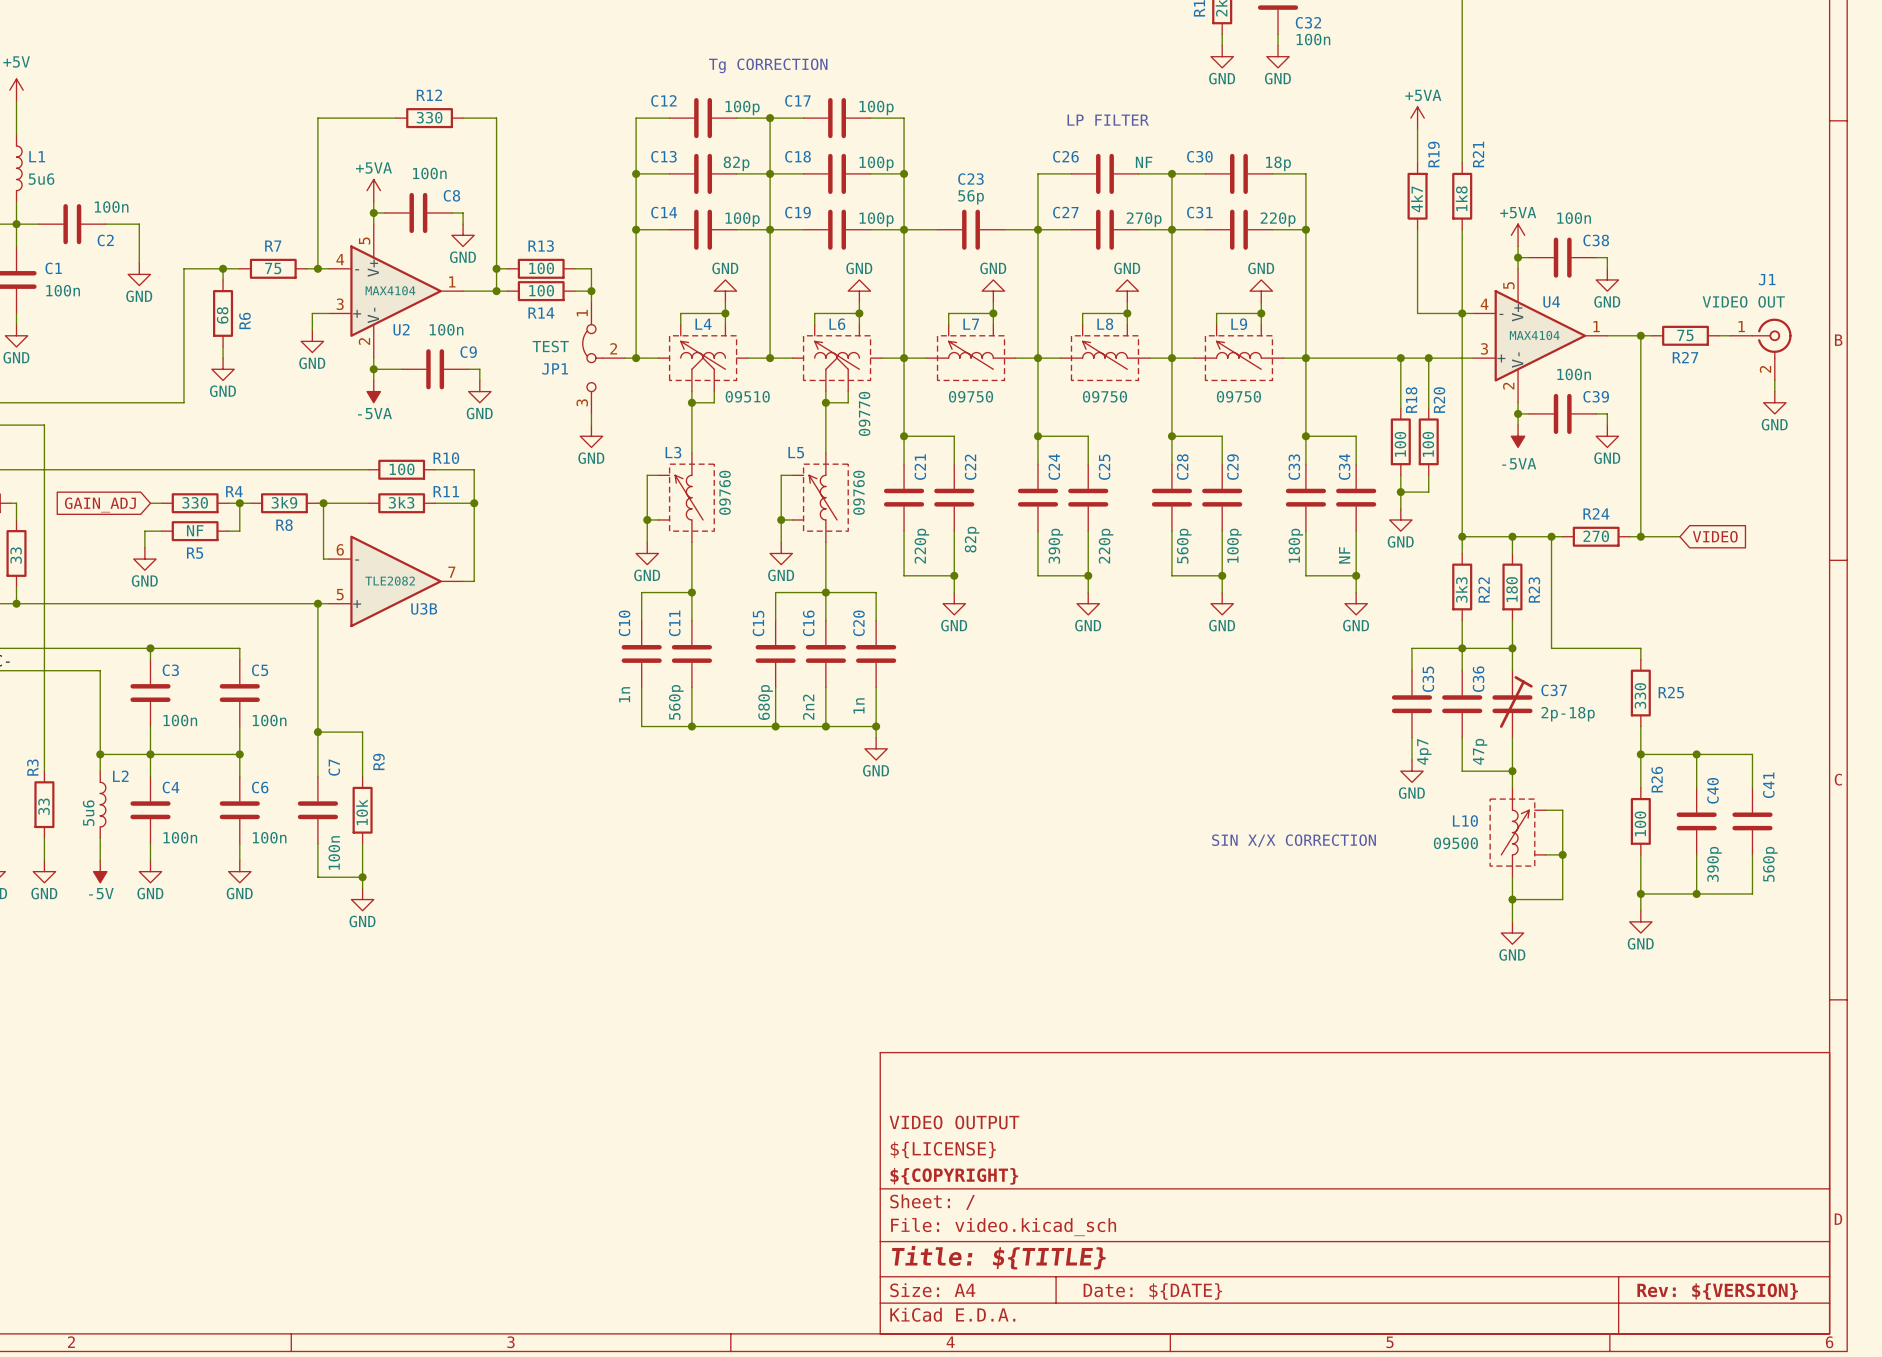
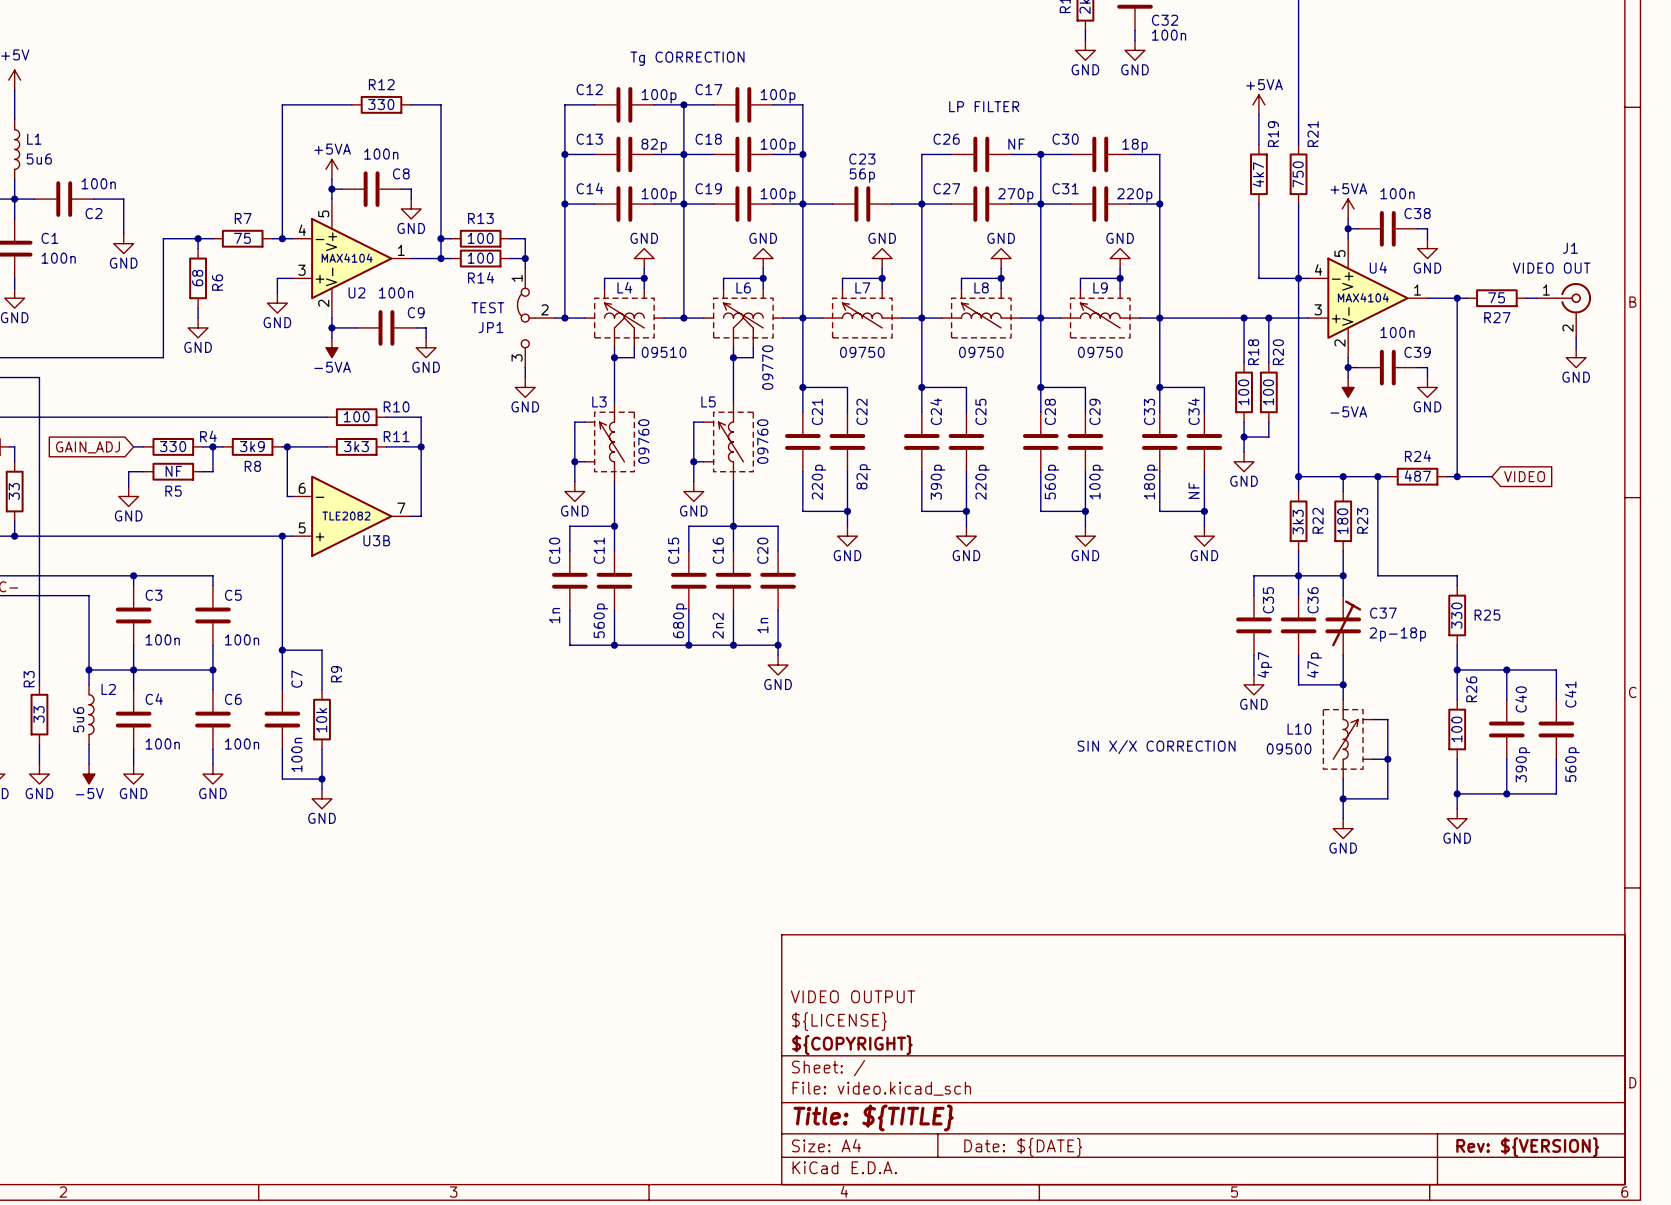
R21 value: 1k8 (1461, 198) -> 750 (1298, 174)
R24 value: 270 (1596, 536) -> 487 (1417, 476)

